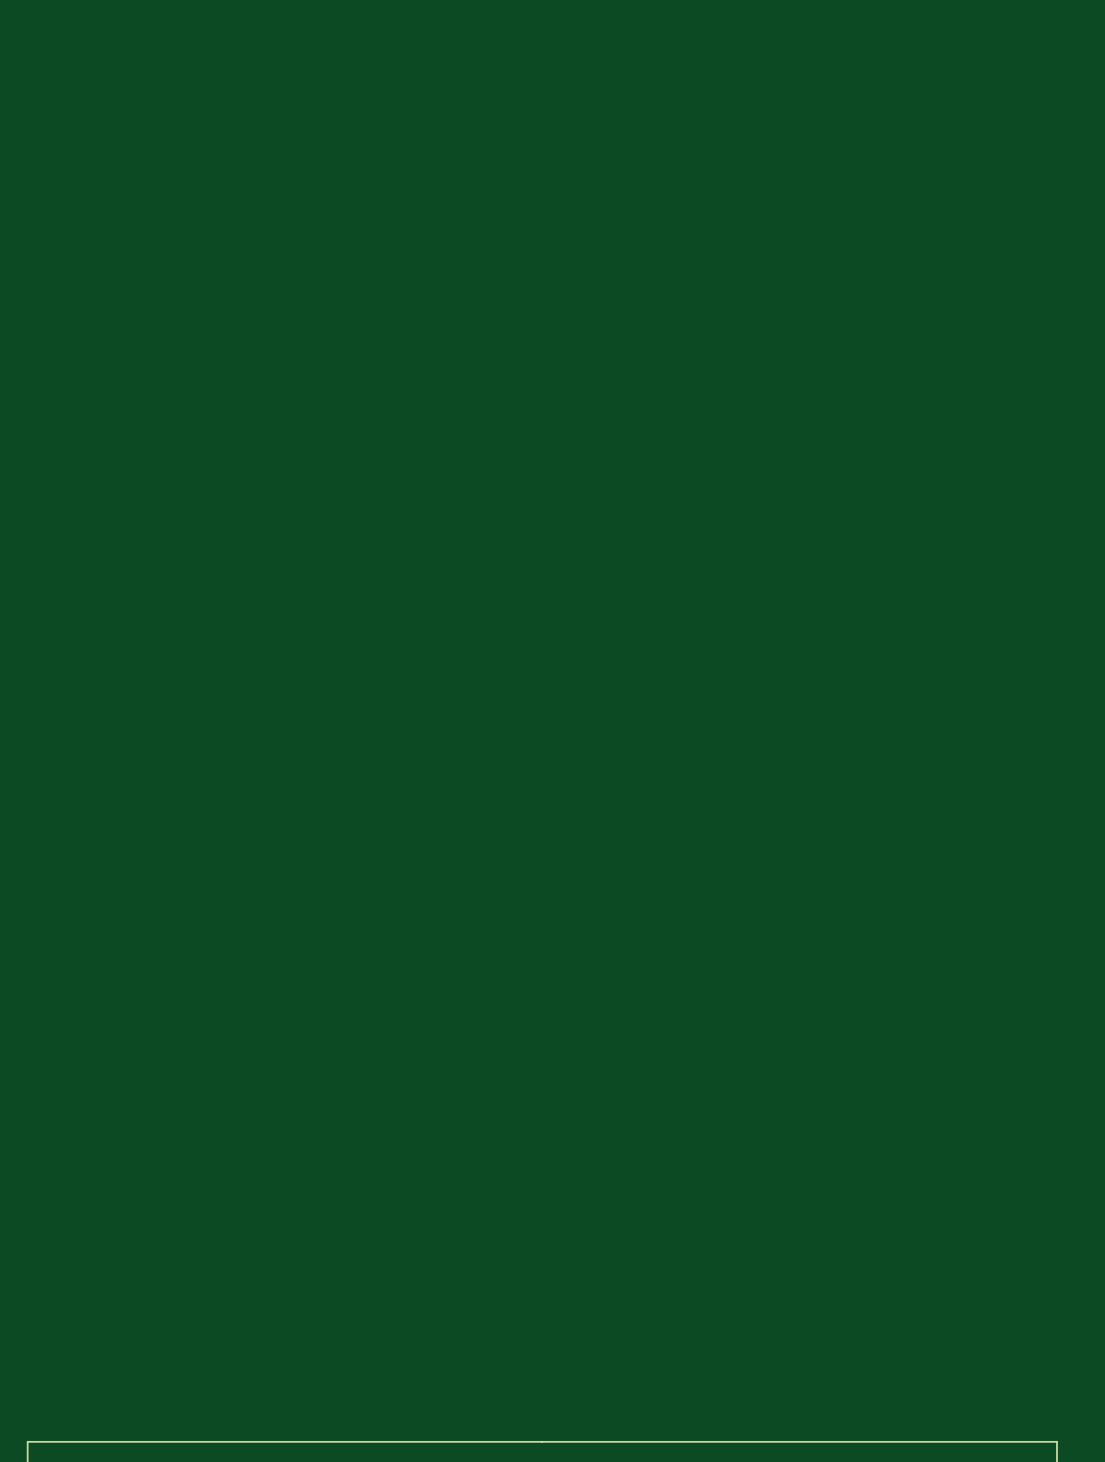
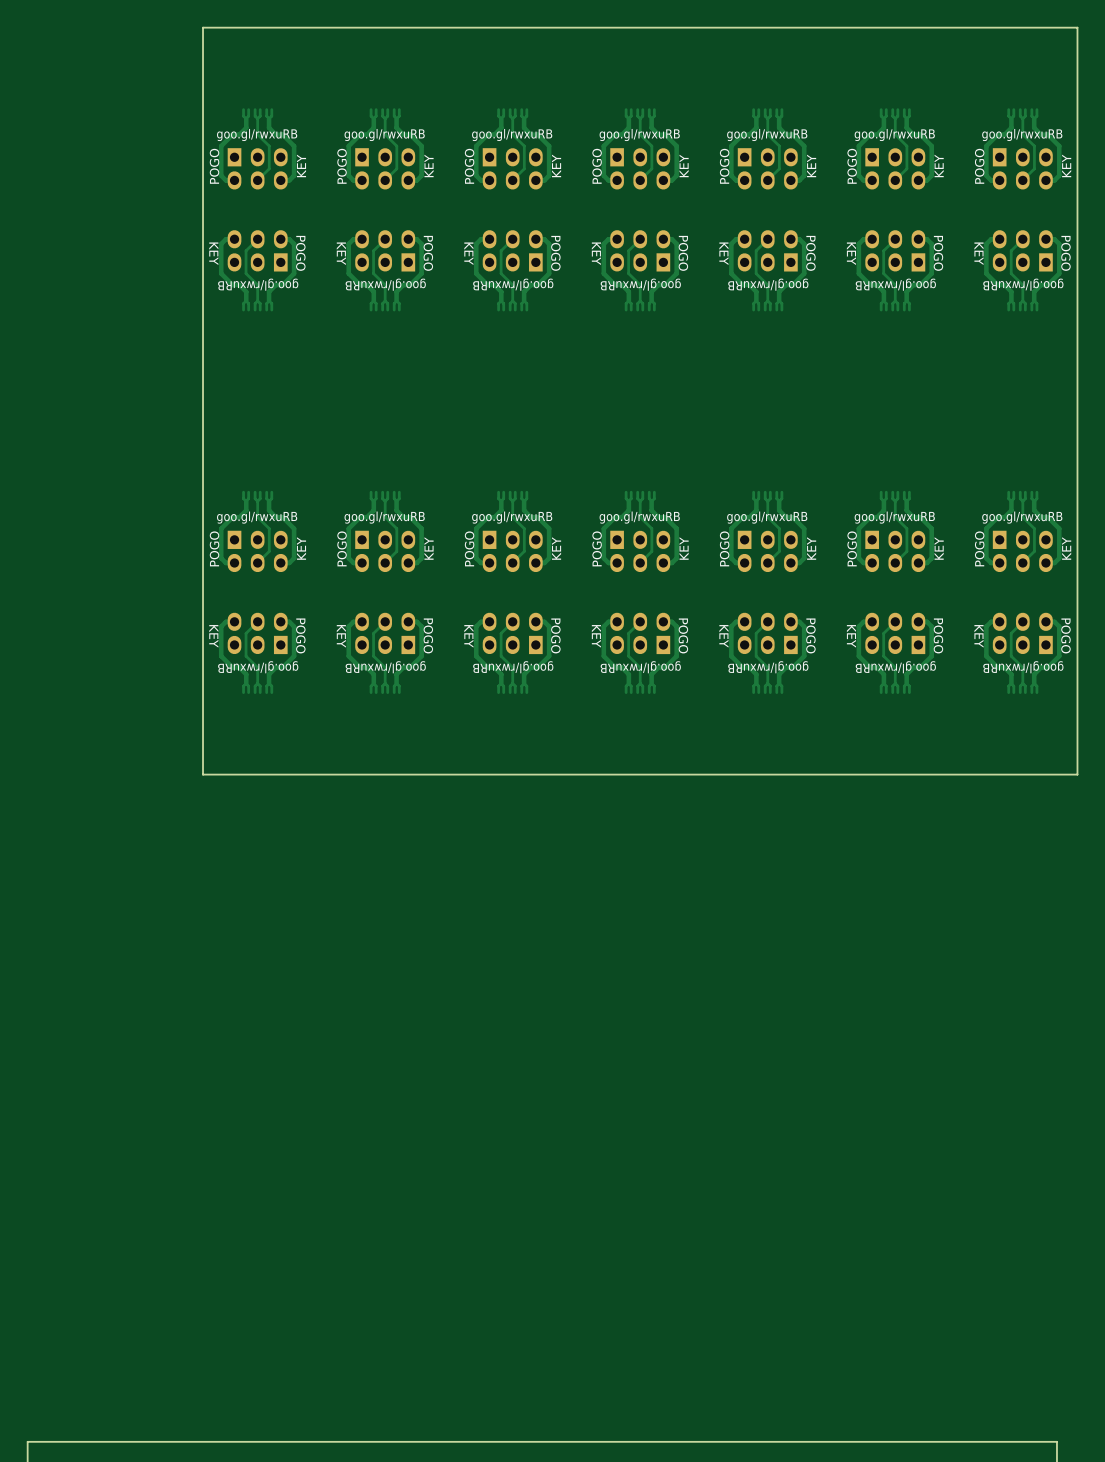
board edge: none -> (1077, 27) (203, 27) (203, 774) (1077, 774) (1077, 27)
track: none -> (243, 109) (243, 116) (246, 118)
track: none -> (248, 109) (248, 116) (246, 118)
track: none -> (255, 109) (255, 116) (257, 118)
track: none -> (260, 109) (260, 116) (257, 118)
track: none -> (266, 109) (266, 116) (269, 118)
track: none -> (271, 109) (271, 116) (269, 118)
track: none -> (371, 109) (371, 116) (373, 118)
track: none -> (376, 109) (376, 116) (373, 118)
track: none -> (382, 109) (382, 116) (385, 118)
track: none -> (387, 109) (387, 116) (385, 118)
track: none -> (394, 109) (394, 116) (396, 118)
track: none -> (399, 109) (399, 116) (396, 118)
track: none -> (498, 109) (498, 116) (501, 118)
track: none -> (503, 109) (503, 116) (501, 118)
track: none -> (510, 109) (510, 116) (512, 118)
track: none -> (515, 109) (515, 116) (512, 118)
track: none -> (521, 109) (521, 116) (524, 118)
track: none -> (526, 109) (526, 116) (524, 118)
track: none -> (626, 109) (626, 116) (628, 118)
track: none -> (631, 109) (631, 116) (628, 118)
track: none -> (637, 109) (637, 116) (640, 118)
track: none -> (642, 109) (642, 116) (640, 118)
track: none -> (649, 109) (649, 116) (651, 118)
track: none -> (654, 109) (654, 116) (651, 118)
track: none -> (753, 109) (753, 116) (756, 118)
track: none -> (758, 109) (758, 116) (756, 118)
track: none -> (765, 109) (765, 116) (767, 118)
track: none -> (770, 109) (770, 116) (767, 118)
track: none -> (776, 109) (776, 116) (779, 118)
track: none -> (781, 109) (781, 116) (779, 118)
track: none -> (881, 109) (881, 116) (883, 118)
track: none -> (886, 109) (886, 116) (883, 118)
track: none -> (892, 109) (892, 116) (895, 118)
track: none -> (897, 109) (897, 116) (895, 118)
track: none -> (904, 109) (904, 116) (906, 118)
track: none -> (909, 109) (909, 116) (906, 118)
track: none -> (1008, 109) (1008, 116) (1011, 118)
track: none -> (1013, 109) (1013, 116) (1011, 118)
track: none -> (1020, 109) (1020, 116) (1022, 118)
track: none -> (1025, 109) (1025, 116) (1022, 118)
track: none -> (1031, 109) (1031, 116) (1034, 118)
track: none -> (1036, 109) (1036, 116) (1034, 118)
track: none -> (246, 118) (246, 127) (239, 134) (232, 134) (221, 146) (221, 175) (225, 180) (234, 180)
track: none -> (257, 118) (257, 134) (269, 146) (269, 168) (257, 180)
track: none -> (269, 118) (269, 127) (275, 134) (282, 134) (294, 146) (294, 175) (289, 180) (280, 180)
track: none -> (373, 118) (373, 127) (366, 134) (360, 134) (348, 146) (348, 175) (353, 180) (362, 180)
track: none -> (385, 118) (385, 134) (396, 146) (396, 168) (385, 180)
track: none -> (396, 118) (396, 127) (403, 134) (410, 134) (421, 146) (421, 175) (416, 180) (408, 180)
track: none -> (501, 118) (501, 127) (494, 134) (487, 134) (476, 146) (476, 175) (481, 180) (489, 180)
track: none -> (512, 118) (512, 134) (524, 146) (524, 168) (512, 180)
track: none -> (524, 118) (524, 127) (530, 134) (537, 134) (549, 146) (549, 175) (544, 180) (535, 180)
track: none -> (628, 118) (628, 127) (622, 134) (615, 134) (603, 146) (603, 175) (608, 180) (617, 180)
track: none -> (640, 118) (640, 134) (651, 146) (651, 168) (640, 180)
track: none -> (651, 118) (651, 127) (658, 134) (665, 134) (676, 146) (676, 175) (671, 180) (663, 180)
track: none -> (756, 118) (756, 127) (749, 134) (742, 134) (731, 146) (731, 175) (736, 180) (744, 180)
track: none -> (767, 118) (767, 134) (779, 146) (779, 168) (767, 180)
track: none -> (779, 118) (779, 127) (785, 134) (792, 134) (804, 146) (804, 175) (799, 180) (790, 180)
track: none -> (883, 118) (883, 127) (877, 134) (870, 134) (858, 146) (858, 175) (863, 180) (872, 180)
track: none -> (895, 118) (895, 134) (906, 146) (906, 168) (895, 180)
track: none -> (906, 118) (906, 127) (913, 134) (920, 134) (931, 146) (931, 175) (926, 180) (918, 180)
track: none -> (1011, 118) (1011, 127) (1004, 134) (997, 134) (986, 146) (986, 175) (991, 180) (999, 180)
track: none -> (1022, 118) (1022, 134) (1034, 146) (1034, 168) (1022, 180)
track: none -> (1034, 118) (1034, 127) (1041, 134) (1047, 134) (1059, 146) (1059, 175) (1054, 180) (1045, 180)
text: none -> goo.gl/rwxuRB (257, 135)
text: none -> goo.gl/rwxuRB (384, 135)
text: none -> goo.gl/rwxuRB (512, 135)
text: none -> goo.gl/rwxuRB (639, 135)
text: none -> goo.gl/rwxuRB (767, 135)
text: none -> goo.gl/rwxuRB (894, 135)
text: none -> goo.gl/rwxuRB (1022, 135)
text: none -> KEY (301, 165)
text: none -> KEY (429, 165)
text: none -> KEY (556, 165)
text: none -> KEY (684, 165)
text: none -> KEY (811, 165)
text: none -> KEY (939, 165)
text: none -> KEY (1066, 165)
text: none -> POGO (214, 166)
text: none -> POGO (342, 166)
text: none -> POGO (469, 166)
text: none -> POGO (597, 166)
text: none -> POGO (724, 166)
text: none -> POGO (852, 166)
text: none -> POGO (979, 166)
part: none -> (257, 168)
part: none -> (385, 168)
part: none -> (512, 168)
part: none -> (640, 168)
part: none -> (767, 168)
part: none -> (895, 168)
part: none -> (1022, 168)
track: none -> (234, 239) (225, 239) (221, 243) (221, 273) (232, 284) (239, 284) (246, 291) (246, 300)
track: none -> (257, 239) (246, 250) (246, 273) (257, 284) (257, 300)
track: none -> (280, 239) (289, 239) (294, 243) (294, 273) (282, 284) (275, 284) (269, 291) (269, 300)
track: none -> (362, 239) (353, 239) (348, 243) (348, 273) (360, 284) (366, 284) (373, 291) (373, 300)
track: none -> (385, 239) (373, 250) (373, 273) (385, 284) (385, 300)
track: none -> (408, 239) (416, 239) (421, 243) (421, 273) (410, 284) (403, 284) (396, 291) (396, 300)
track: none -> (489, 239) (481, 239) (476, 243) (476, 273) (487, 284) (494, 284) (501, 291) (501, 300)
track: none -> (512, 239) (501, 250) (501, 273) (512, 284) (512, 300)
track: none -> (535, 239) (544, 239) (549, 243) (549, 273) (537, 284) (530, 284) (524, 291) (524, 300)
track: none -> (617, 239) (608, 239) (603, 243) (603, 273) (615, 284) (622, 284) (628, 291) (628, 300)
track: none -> (640, 239) (628, 250) (628, 273) (640, 284) (640, 300)
track: none -> (663, 239) (671, 239) (676, 243) (676, 273) (665, 284) (658, 284) (651, 291) (651, 300)
track: none -> (744, 239) (736, 239) (731, 243) (731, 273) (742, 284) (749, 284) (756, 291) (756, 300)
track: none -> (767, 239) (756, 250) (756, 273) (767, 284) (767, 300)
track: none -> (790, 239) (799, 239) (804, 243) (804, 273) (792, 284) (785, 284) (779, 291) (779, 300)
track: none -> (872, 239) (863, 239) (858, 243) (858, 273) (870, 284) (877, 284) (883, 291) (883, 300)
track: none -> (895, 239) (883, 250) (883, 273) (895, 284) (895, 300)
track: none -> (918, 239) (926, 239) (931, 243) (931, 273) (920, 284) (913, 284) (906, 291) (906, 300)
track: none -> (999, 239) (991, 239) (986, 243) (986, 273) (997, 284) (1004, 284) (1011, 291) (1011, 300)
track: none -> (1022, 239) (1011, 250) (1011, 273) (1022, 284) (1022, 300)
track: none -> (1045, 239) (1054, 239) (1059, 243) (1059, 273) (1047, 284) (1041, 284) (1034, 291) (1034, 300)
part: none -> (257, 250)
part: none -> (385, 250)
part: none -> (512, 250)
part: none -> (640, 250)
part: none -> (767, 250)
part: none -> (895, 250)
part: none -> (1022, 250)
text: none -> KEY (213, 253)
text: none -> POGO (300, 253)
text: none -> KEY (341, 253)
text: none -> POGO (428, 253)
text: none -> KEY (468, 253)
text: none -> POGO (555, 253)
text: none -> KEY (596, 253)
text: none -> POGO (683, 253)
text: none -> KEY (723, 253)
text: none -> POGO (810, 253)
text: none -> KEY (851, 253)
text: none -> POGO (938, 253)
text: none -> KEY (978, 253)
text: none -> POGO (1065, 253)
text: none -> goo.gl/rwxuRB (258, 284)
text: none -> goo.gl/rwxuRB (385, 284)
text: none -> goo.gl/rwxuRB (513, 284)
text: none -> goo.gl/rwxuRB (640, 284)
text: none -> goo.gl/rwxuRB (768, 284)
text: none -> goo.gl/rwxuRB (895, 284)
text: none -> goo.gl/rwxuRB (1023, 284)
track: none -> (246, 300) (248, 303) (248, 310)
track: none -> (246, 300) (243, 303) (243, 310)
track: none -> (257, 300) (260, 303) (260, 310)
track: none -> (257, 300) (255, 303) (255, 310)
track: none -> (269, 300) (271, 303) (271, 310)
track: none -> (269, 300) (266, 303) (266, 310)
track: none -> (373, 300) (376, 303) (376, 310)
track: none -> (373, 300) (371, 303) (371, 310)
track: none -> (385, 300) (387, 303) (387, 310)
track: none -> (385, 300) (382, 303) (382, 310)
track: none -> (396, 300) (399, 303) (399, 310)
track: none -> (396, 300) (394, 303) (394, 310)
track: none -> (501, 300) (498, 303) (498, 310)
track: none -> (501, 300) (503, 303) (503, 310)
track: none -> (512, 300) (510, 303) (510, 310)
track: none -> (512, 300) (515, 303) (515, 310)
track: none -> (524, 300) (521, 303) (521, 310)
track: none -> (524, 300) (526, 303) (526, 310)
track: none -> (628, 300) (631, 303) (631, 310)
track: none -> (628, 300) (626, 303) (626, 310)
track: none -> (640, 300) (642, 303) (642, 310)
track: none -> (640, 300) (637, 303) (637, 310)
track: none -> (651, 300) (649, 303) (649, 310)
track: none -> (651, 300) (654, 303) (654, 310)
track: none -> (756, 300) (753, 303) (753, 310)
track: none -> (756, 300) (758, 303) (758, 310)
track: none -> (767, 300) (765, 303) (765, 310)
track: none -> (767, 300) (770, 303) (770, 310)
track: none -> (779, 300) (776, 303) (776, 310)
track: none -> (779, 300) (781, 303) (781, 310)
track: none -> (883, 300) (881, 303) (881, 310)
track: none -> (883, 300) (886, 303) (886, 310)
track: none -> (895, 300) (892, 303) (892, 310)
track: none -> (895, 300) (897, 303) (897, 310)
track: none -> (906, 300) (904, 303) (904, 310)
track: none -> (906, 300) (909, 303) (909, 310)
track: none -> (1011, 300) (1008, 303) (1008, 310)
track: none -> (1011, 300) (1013, 303) (1013, 310)
track: none -> (1022, 300) (1020, 303) (1020, 310)
track: none -> (1022, 300) (1025, 303) (1025, 310)
track: none -> (1034, 300) (1031, 303) (1031, 310)
track: none -> (1034, 300) (1036, 303) (1036, 310)
track: none -> (243, 492) (243, 498) (246, 501)
track: none -> (248, 492) (248, 498) (246, 501)
track: none -> (255, 492) (255, 498) (257, 501)
track: none -> (260, 492) (260, 498) (257, 501)
track: none -> (266, 492) (266, 498) (269, 501)
track: none -> (271, 492) (271, 498) (269, 501)
track: none -> (371, 492) (371, 498) (373, 501)
track: none -> (376, 492) (376, 498) (373, 501)
track: none -> (382, 492) (382, 498) (385, 501)
track: none -> (387, 492) (387, 498) (385, 501)
track: none -> (394, 492) (394, 498) (396, 501)
track: none -> (399, 492) (399, 498) (396, 501)
track: none -> (498, 492) (498, 498) (501, 501)
track: none -> (503, 492) (503, 498) (501, 501)
track: none -> (510, 492) (510, 498) (512, 501)
track: none -> (515, 492) (515, 498) (512, 501)
track: none -> (521, 492) (521, 498) (524, 501)
track: none -> (526, 492) (526, 498) (524, 501)
track: none -> (626, 492) (626, 498) (628, 501)
track: none -> (631, 492) (631, 498) (628, 501)
track: none -> (637, 492) (637, 498) (640, 501)
track: none -> (642, 492) (642, 498) (640, 501)
track: none -> (649, 492) (649, 498) (651, 501)
track: none -> (654, 492) (654, 498) (651, 501)
track: none -> (753, 492) (753, 498) (756, 501)
track: none -> (758, 492) (758, 498) (756, 501)
track: none -> (765, 492) (765, 498) (767, 501)
track: none -> (770, 492) (770, 498) (767, 501)
track: none -> (776, 492) (776, 498) (779, 501)
track: none -> (781, 492) (781, 498) (779, 501)
track: none -> (881, 492) (881, 498) (883, 501)
track: none -> (886, 492) (886, 498) (883, 501)
track: none -> (892, 492) (892, 498) (895, 501)
track: none -> (897, 492) (897, 498) (895, 501)
track: none -> (904, 492) (904, 498) (906, 501)
track: none -> (909, 492) (909, 498) (906, 501)
track: none -> (1008, 492) (1008, 498) (1011, 501)
track: none -> (1013, 492) (1013, 498) (1011, 501)
track: none -> (1020, 492) (1020, 498) (1022, 501)
track: none -> (1025, 492) (1025, 498) (1022, 501)
track: none -> (1031, 492) (1031, 498) (1034, 501)
track: none -> (1036, 492) (1036, 498) (1034, 501)
track: none -> (246, 501) (246, 510) (239, 517) (232, 517) (221, 528) (221, 558) (225, 562) (234, 562)
track: none -> (257, 501) (257, 517) (269, 528) (269, 551) (257, 562)
track: none -> (269, 501) (269, 510) (275, 517) (282, 517) (294, 528) (294, 558) (289, 562) (280, 562)
track: none -> (373, 501) (373, 510) (366, 517) (360, 517) (348, 528) (348, 558) (353, 562) (362, 562)
track: none -> (385, 501) (385, 517) (396, 528) (396, 551) (385, 562)
track: none -> (396, 501) (396, 510) (403, 517) (410, 517) (421, 528) (421, 558) (416, 562) (408, 562)
track: none -> (501, 501) (501, 510) (494, 517) (487, 517) (476, 528) (476, 558) (481, 562) (489, 562)
track: none -> (512, 501) (512, 517) (524, 528) (524, 551) (512, 562)
track: none -> (524, 501) (524, 510) (530, 517) (537, 517) (549, 528) (549, 558) (544, 562) (535, 562)
track: none -> (628, 501) (628, 510) (622, 517) (615, 517) (603, 528) (603, 558) (608, 562) (617, 562)
track: none -> (640, 501) (640, 517) (651, 528) (651, 551) (640, 562)
track: none -> (651, 501) (651, 510) (658, 517) (665, 517) (676, 528) (676, 558) (671, 562) (663, 562)
track: none -> (756, 501) (756, 510) (749, 517) (742, 517) (731, 528) (731, 558) (736, 562) (744, 562)
track: none -> (767, 501) (767, 517) (779, 528) (779, 551) (767, 562)
track: none -> (779, 501) (779, 510) (785, 517) (792, 517) (804, 528) (804, 558) (799, 562) (790, 562)
track: none -> (883, 501) (883, 510) (877, 517) (870, 517) (858, 528) (858, 558) (863, 562) (872, 562)
track: none -> (895, 501) (895, 517) (906, 528) (906, 551) (895, 562)
track: none -> (906, 501) (906, 510) (913, 517) (920, 517) (931, 528) (931, 558) (926, 562) (918, 562)
track: none -> (1011, 501) (1011, 510) (1004, 517) (997, 517) (986, 528) (986, 558) (991, 562) (999, 562)
track: none -> (1022, 501) (1022, 517) (1034, 528) (1034, 551) (1022, 562)
track: none -> (1034, 501) (1034, 510) (1041, 517) (1047, 517) (1059, 528) (1059, 558) (1054, 562) (1045, 562)
text: none -> goo.gl/rwxuRB (257, 517)
text: none -> goo.gl/rwxuRB (384, 517)
text: none -> goo.gl/rwxuRB (512, 517)
text: none -> goo.gl/rwxuRB (639, 517)
text: none -> goo.gl/rwxuRB (767, 517)
text: none -> goo.gl/rwxuRB (894, 517)
text: none -> goo.gl/rwxuRB (1022, 517)
text: none -> POGO (214, 548)
text: none -> KEY (301, 548)
text: none -> POGO (342, 548)
text: none -> KEY (429, 548)
text: none -> POGO (469, 548)
text: none -> KEY (556, 548)
text: none -> POGO (597, 548)
text: none -> KEY (684, 548)
text: none -> POGO (724, 548)
text: none -> KEY (811, 548)
text: none -> POGO (852, 548)
text: none -> KEY (939, 548)
text: none -> POGO (979, 548)
text: none -> KEY (1066, 548)
part: none -> (257, 551)
part: none -> (385, 551)
part: none -> (512, 551)
part: none -> (640, 551)
part: none -> (767, 551)
part: none -> (895, 551)
part: none -> (1022, 551)
track: none -> (234, 621) (225, 621) (221, 626) (221, 656) (232, 667) (239, 667) (246, 674) (246, 683)
track: none -> (257, 621) (246, 633) (246, 656) (257, 667) (257, 683)
track: none -> (280, 621) (289, 621) (294, 626) (294, 656) (282, 667) (275, 667) (269, 674) (269, 683)
track: none -> (362, 621) (353, 621) (348, 626) (348, 656) (360, 667) (366, 667) (373, 674) (373, 683)
track: none -> (385, 621) (373, 633) (373, 656) (385, 667) (385, 683)
track: none -> (408, 621) (416, 621) (421, 626) (421, 656) (410, 667) (403, 667) (396, 674) (396, 683)
track: none -> (489, 621) (481, 621) (476, 626) (476, 656) (487, 667) (494, 667) (501, 674) (501, 683)
track: none -> (512, 621) (501, 633) (501, 656) (512, 667) (512, 683)
track: none -> (535, 621) (544, 621) (549, 626) (549, 656) (537, 667) (530, 667) (524, 674) (524, 683)
track: none -> (617, 621) (608, 621) (603, 626) (603, 656) (615, 667) (622, 667) (628, 674) (628, 683)
track: none -> (640, 621) (628, 633) (628, 656) (640, 667) (640, 683)
track: none -> (663, 621) (671, 621) (676, 626) (676, 656) (665, 667) (658, 667) (651, 674) (651, 683)
track: none -> (744, 621) (736, 621) (731, 626) (731, 656) (742, 667) (749, 667) (756, 674) (756, 683)
track: none -> (767, 621) (756, 633) (756, 656) (767, 667) (767, 683)
track: none -> (790, 621) (799, 621) (804, 626) (804, 656) (792, 667) (785, 667) (779, 674) (779, 683)
track: none -> (872, 621) (863, 621) (858, 626) (858, 656) (870, 667) (877, 667) (883, 674) (883, 683)
track: none -> (895, 621) (883, 633) (883, 656) (895, 667) (895, 683)
track: none -> (918, 621) (926, 621) (931, 626) (931, 656) (920, 667) (913, 667) (906, 674) (906, 683)
track: none -> (999, 621) (991, 621) (986, 626) (986, 656) (997, 667) (1004, 667) (1011, 674) (1011, 683)
track: none -> (1022, 621) (1011, 633) (1011, 656) (1022, 667) (1022, 683)
track: none -> (1045, 621) (1054, 621) (1059, 626) (1059, 656) (1047, 667) (1041, 667) (1034, 674) (1034, 683)
part: none -> (257, 633)
part: none -> (385, 633)
part: none -> (512, 633)
part: none -> (640, 633)
part: none -> (767, 633)
part: none -> (895, 633)
part: none -> (1022, 633)
text: none -> POGO (300, 635)
text: none -> POGO (428, 635)
text: none -> POGO (555, 635)
text: none -> POGO (683, 635)
text: none -> POGO (810, 635)
text: none -> POGO (938, 635)
text: none -> POGO (1065, 635)
text: none -> KEY (213, 636)
text: none -> KEY (341, 636)
text: none -> KEY (468, 636)
text: none -> KEY (596, 636)
text: none -> KEY (723, 636)
text: none -> KEY (851, 636)
text: none -> KEY (978, 636)
text: none -> goo.gl/rwxuRB (258, 667)
text: none -> goo.gl/rwxuRB (385, 667)
text: none -> goo.gl/rwxuRB (513, 667)
text: none -> goo.gl/rwxuRB (640, 667)
text: none -> goo.gl/rwxuRB (768, 667)
text: none -> goo.gl/rwxuRB (895, 667)
text: none -> goo.gl/rwxuRB (1023, 667)
track: none -> (246, 683) (243, 686) (243, 692)
track: none -> (246, 683) (248, 686) (248, 692)
track: none -> (257, 683) (255, 686) (255, 692)
track: none -> (257, 683) (260, 686) (260, 692)
track: none -> (269, 683) (266, 686) (266, 692)
track: none -> (269, 683) (271, 686) (271, 692)
track: none -> (373, 683) (371, 686) (371, 692)
track: none -> (373, 683) (376, 686) (376, 692)
track: none -> (385, 683) (382, 686) (382, 692)
track: none -> (385, 683) (387, 686) (387, 692)
track: none -> (396, 683) (394, 686) (394, 692)
track: none -> (396, 683) (399, 686) (399, 692)
track: none -> (501, 683) (503, 686) (503, 692)
track: none -> (501, 683) (498, 686) (498, 692)
track: none -> (512, 683) (515, 686) (515, 692)
track: none -> (512, 683) (510, 686) (510, 692)
track: none -> (524, 683) (521, 686) (521, 692)
track: none -> (524, 683) (526, 686) (526, 692)
track: none -> (628, 683) (631, 686) (631, 692)
track: none -> (628, 683) (626, 686) (626, 692)
track: none -> (640, 683) (642, 686) (642, 692)
track: none -> (640, 683) (637, 686) (637, 692)
track: none -> (651, 683) (654, 686) (654, 692)
track: none -> (651, 683) (649, 686) (649, 692)
track: none -> (756, 683) (753, 686) (753, 692)
track: none -> (756, 683) (758, 686) (758, 692)
track: none -> (767, 683) (765, 686) (765, 692)
track: none -> (767, 683) (770, 686) (770, 692)
track: none -> (779, 683) (776, 686) (776, 692)
track: none -> (779, 683) (781, 686) (781, 692)
track: none -> (883, 683) (886, 686) (886, 692)
track: none -> (883, 683) (881, 686) (881, 692)
track: none -> (895, 683) (897, 686) (897, 692)
track: none -> (895, 683) (892, 686) (892, 692)
track: none -> (906, 683) (909, 686) (909, 692)
track: none -> (906, 683) (904, 686) (904, 692)
track: none -> (1011, 683) (1013, 686) (1013, 692)
track: none -> (1011, 683) (1008, 686) (1008, 692)
track: none -> (1022, 683) (1025, 686) (1025, 692)
track: none -> (1022, 683) (1020, 686) (1020, 692)
track: none -> (1034, 683) (1036, 686) (1036, 692)
track: none -> (1034, 683) (1031, 686) (1031, 692)

